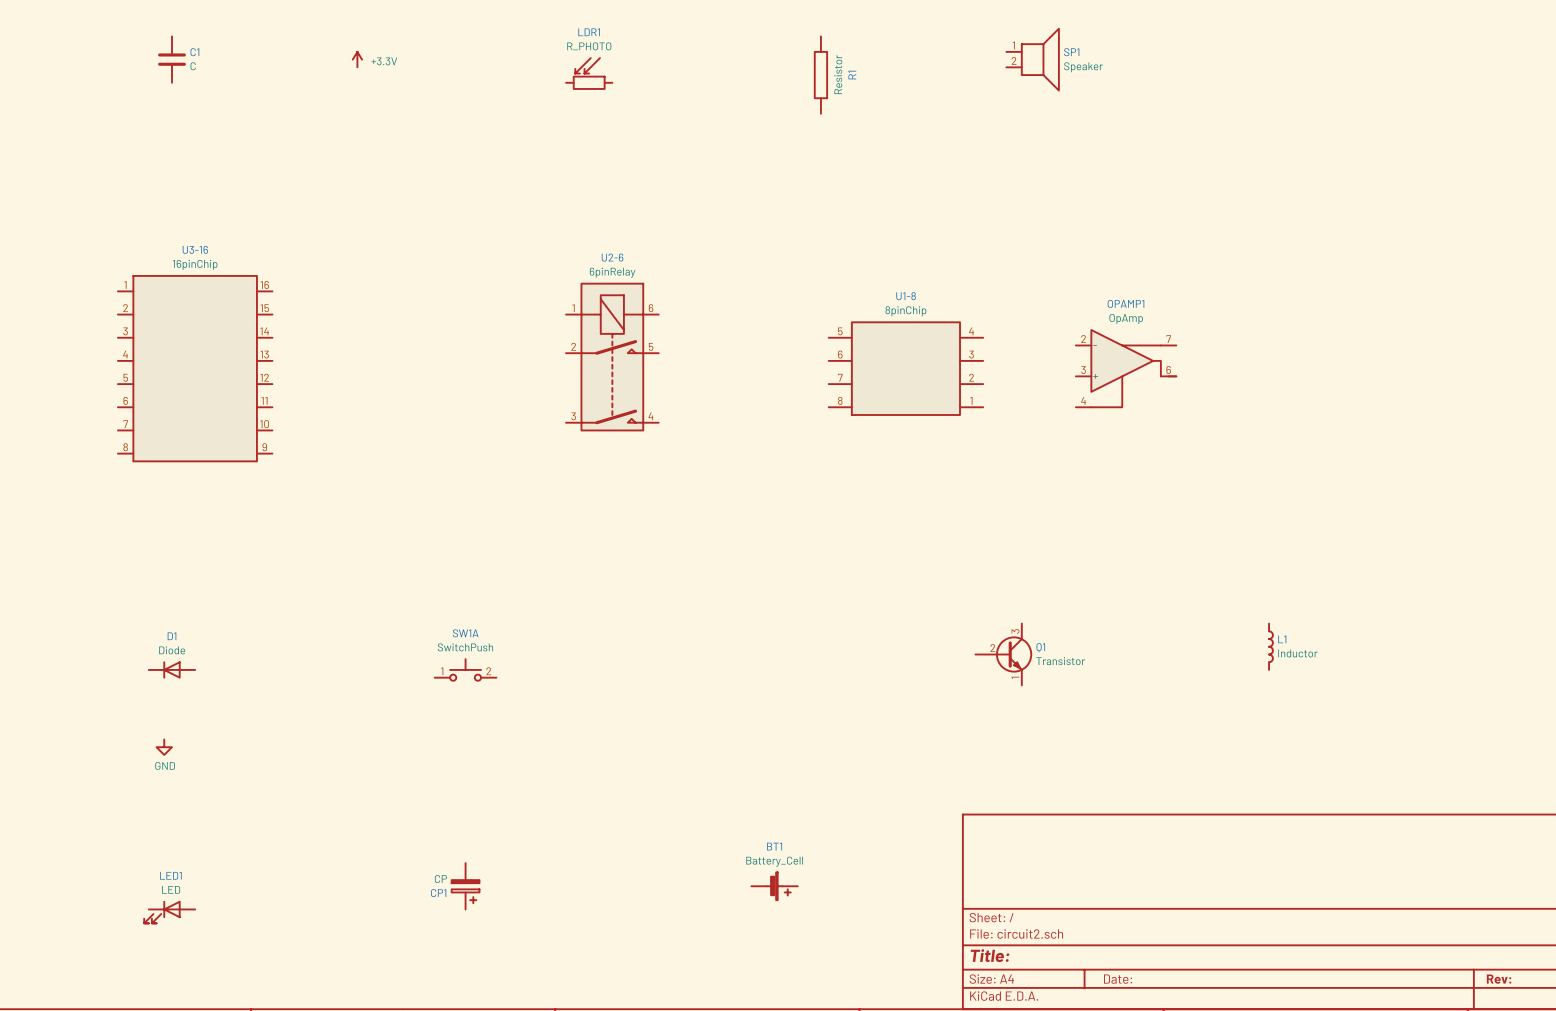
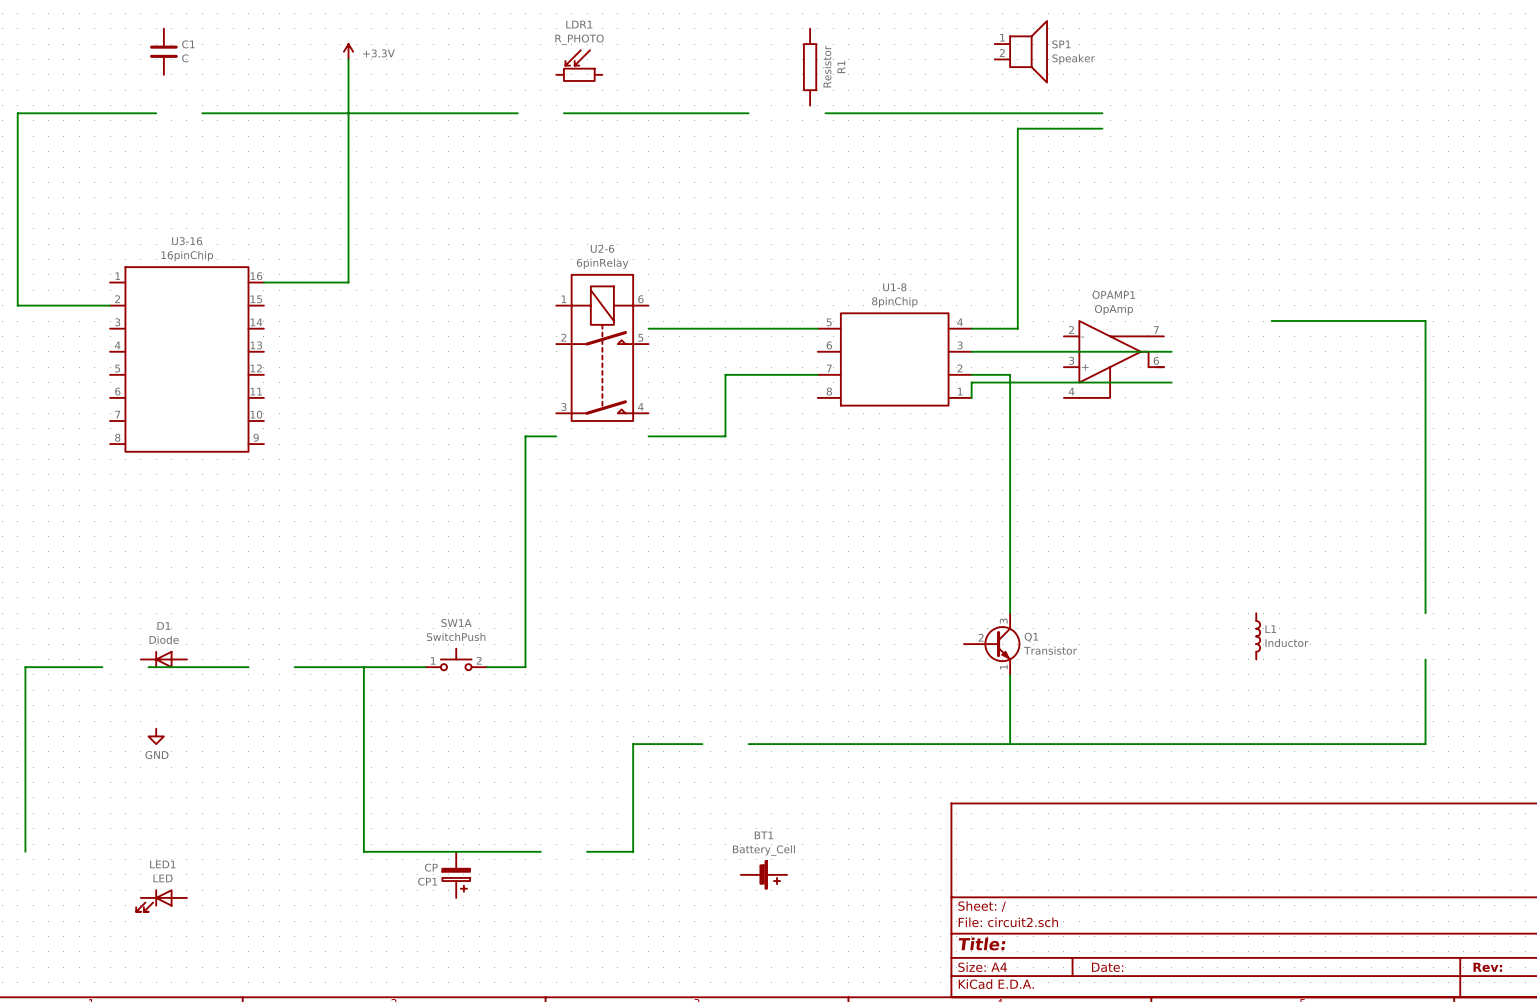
wire: none -> (348, 59) (348, 282) (263, 282)
wire: none -> (156, 113) (17, 113) (17, 305) (110, 305)
wire: none -> (202, 113) (517, 113)
wire: none -> (563, 113) (748, 113)
wire: none -> (825, 113) (1102, 113)
wire: none -> (1102, 128) (1017, 128) (1017, 328) (971, 328)
wire: none -> (1271, 321) (1425, 321) (1425, 613)
wire: none -> (648, 328) (817, 328)
wire: none -> (971, 351) (1171, 351)
wire: none -> (817, 374) (725, 374) (725, 436) (648, 436)
wire: none -> (971, 374) (1010, 374) (1010, 613)
wire: none -> (1171, 382) (971, 382) (971, 397)
wire: none -> (556, 436) (525, 436) (525, 667) (486, 667)
wire: none -> (1425, 659) (1425, 744) (748, 744)
wire: none -> (102, 667) (25, 667) (25, 851)
wire: none -> (148, 667) (248, 667)
wire: none -> (294, 667) (425, 667)
wire: none -> (363, 667) (363, 851) (540, 851)
wire: none -> (1010, 674) (1010, 744)
wire: none -> (702, 744) (633, 744) (633, 851) (587, 851)

